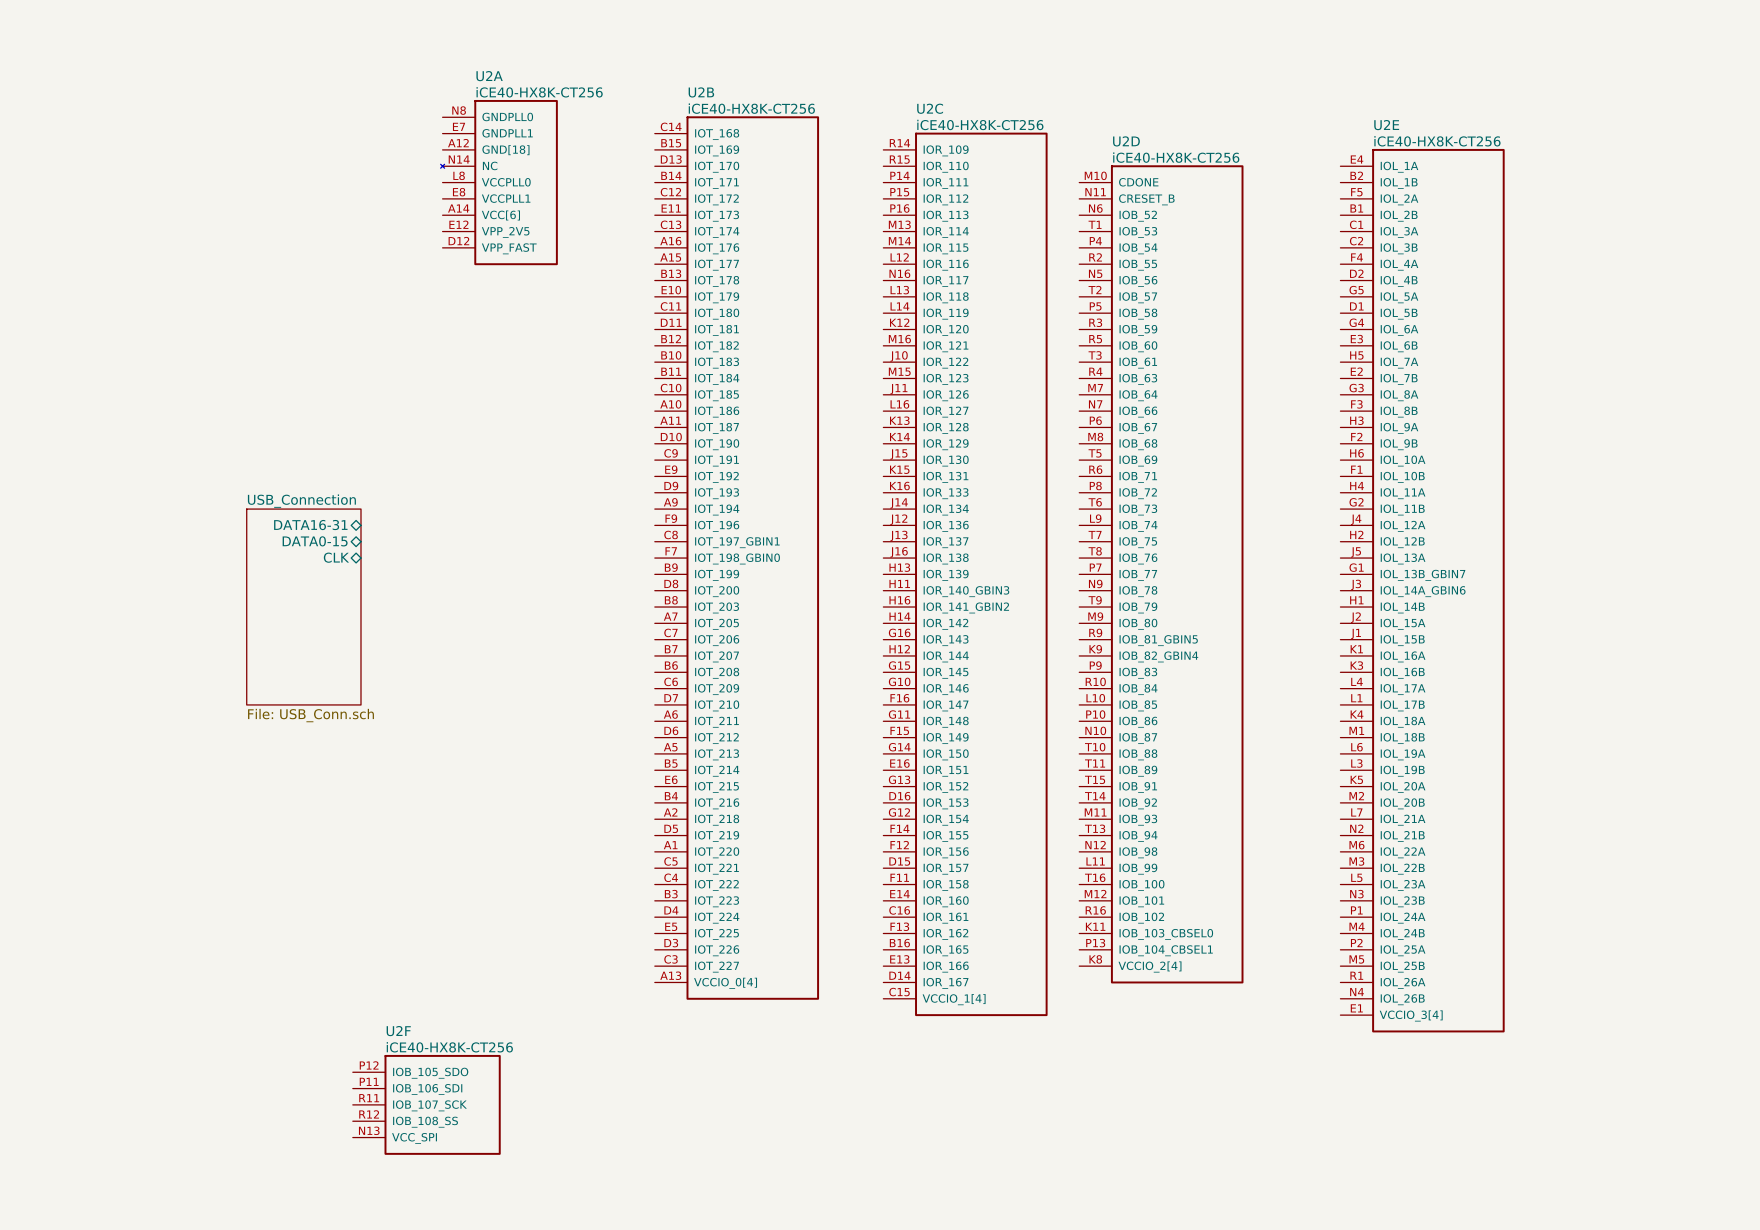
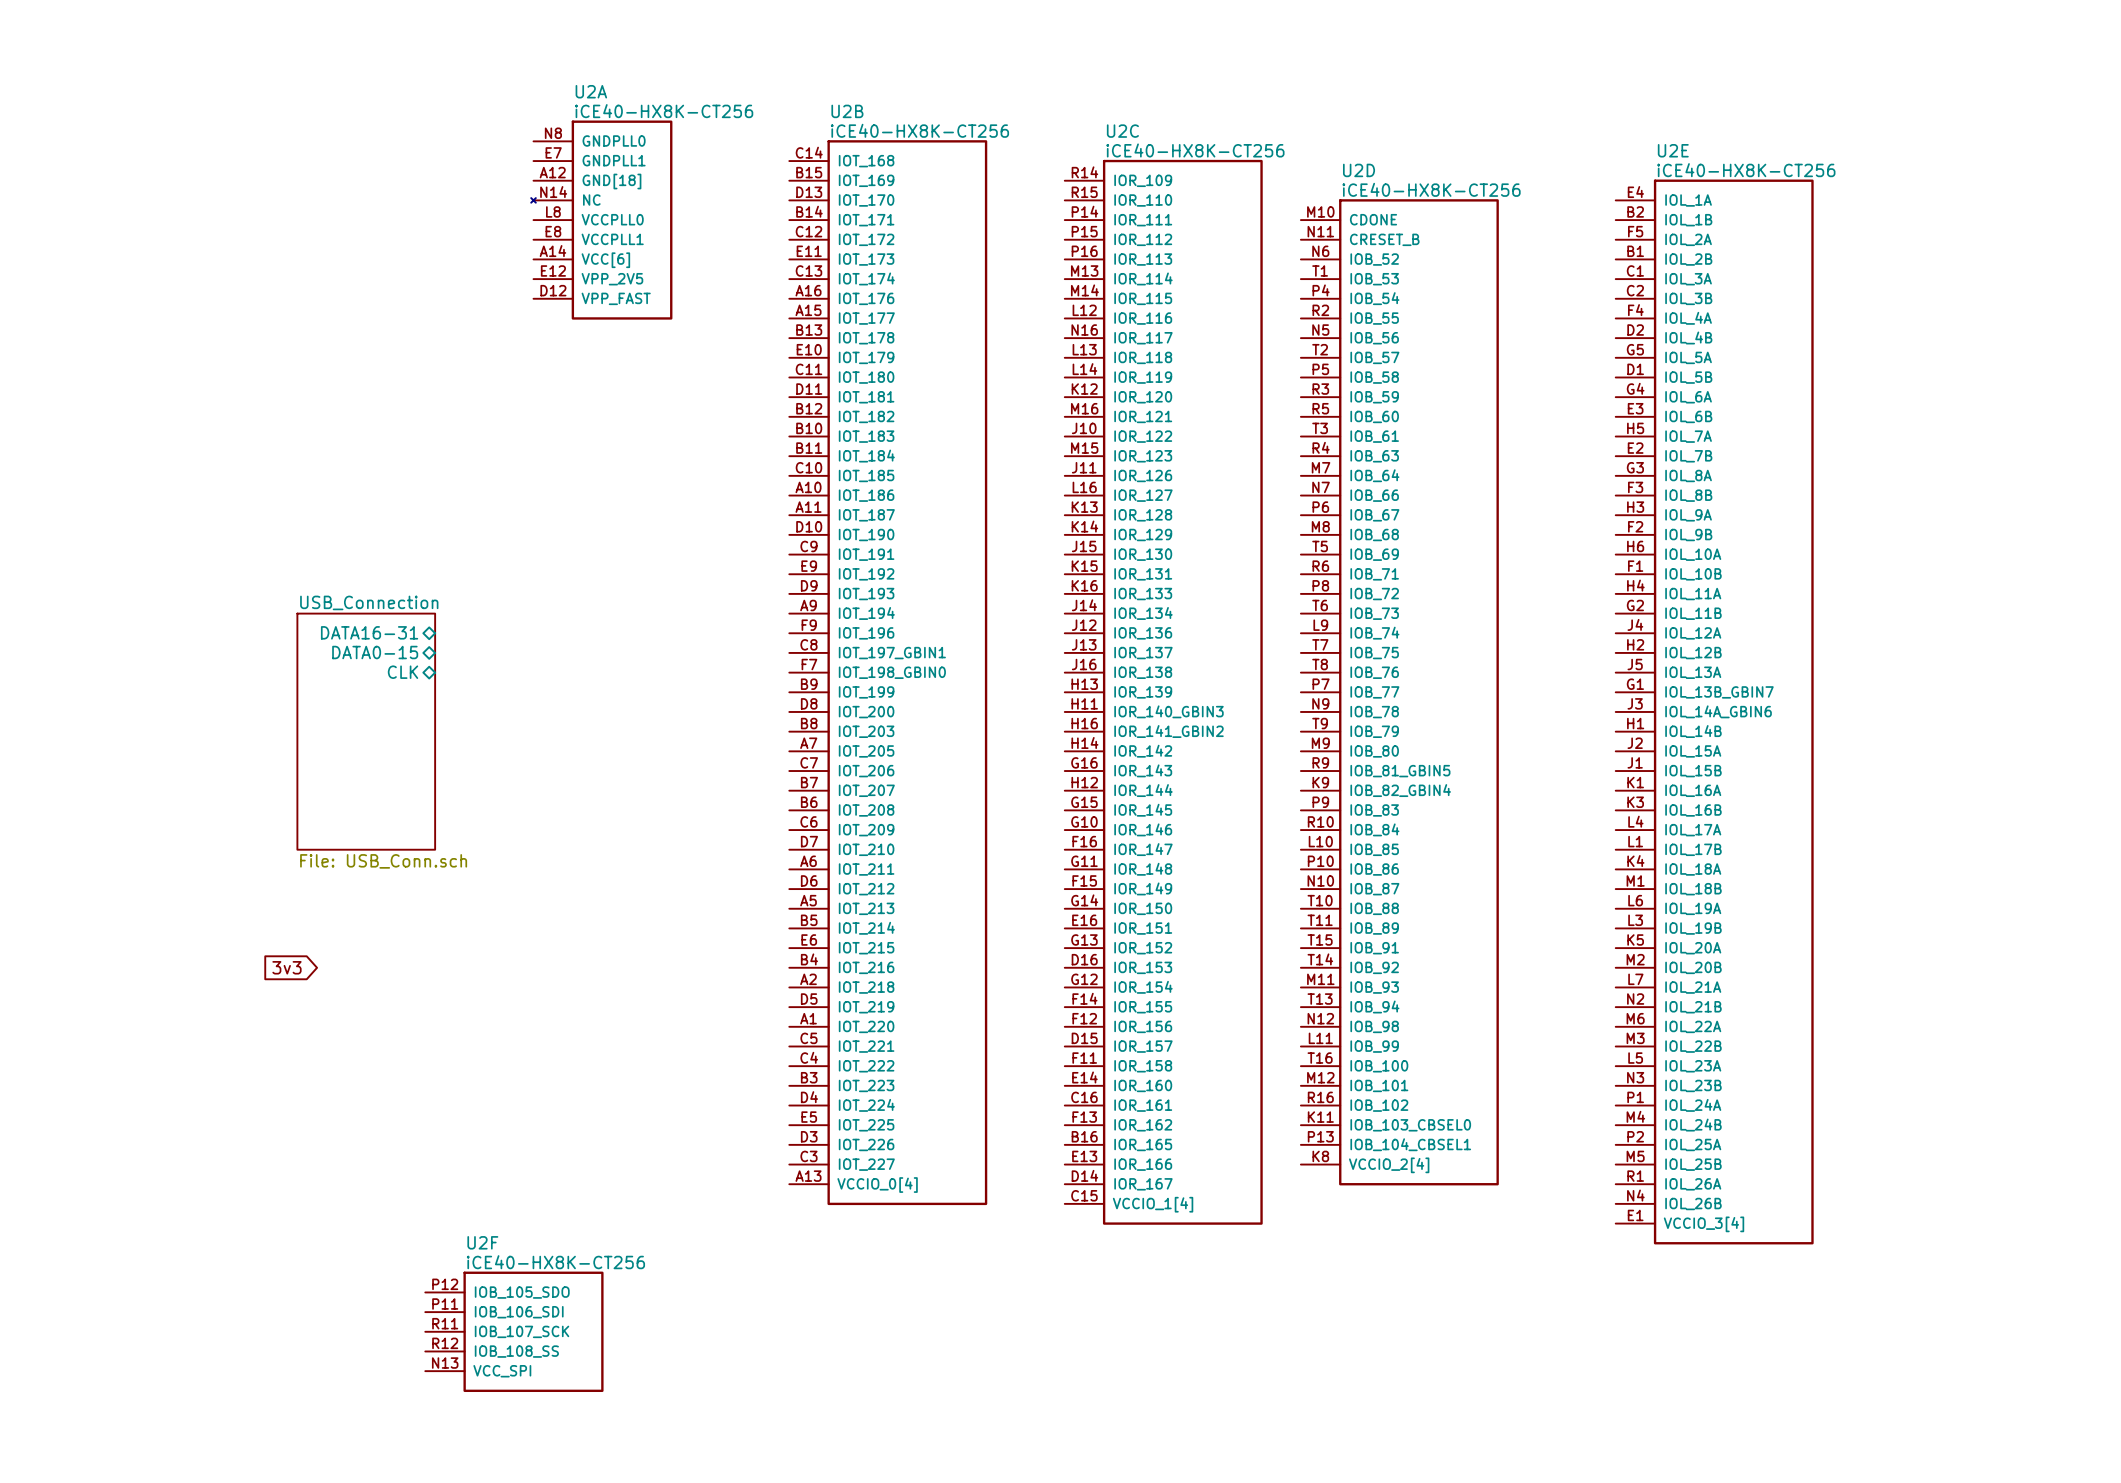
global label: none -> 3v3 (286, 967)

